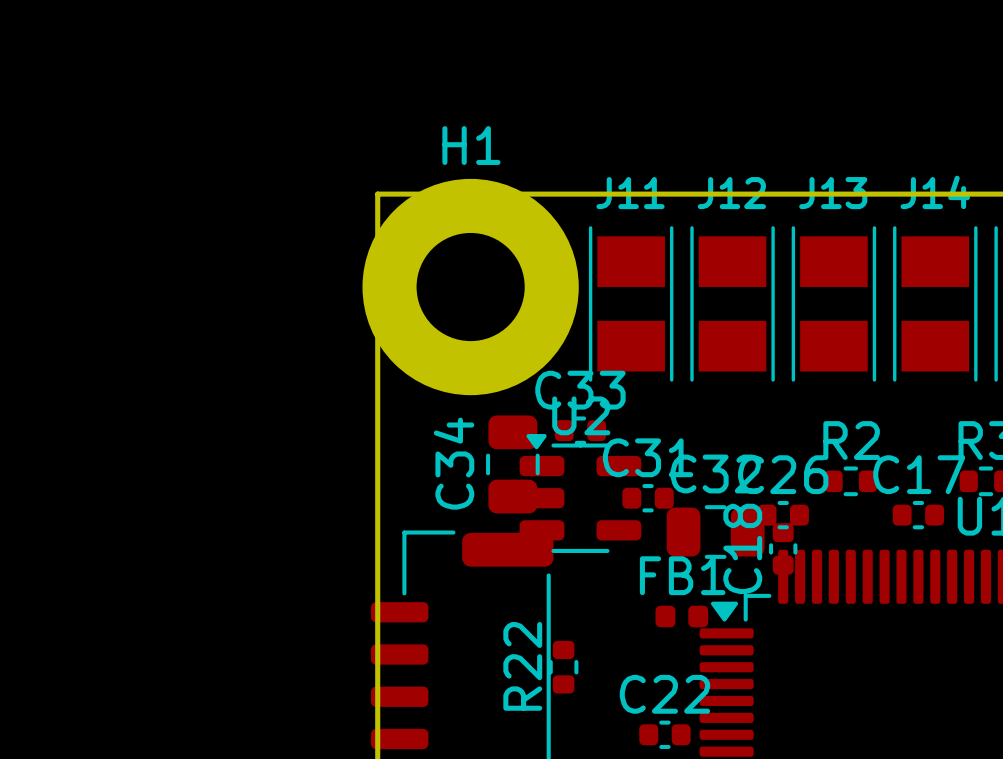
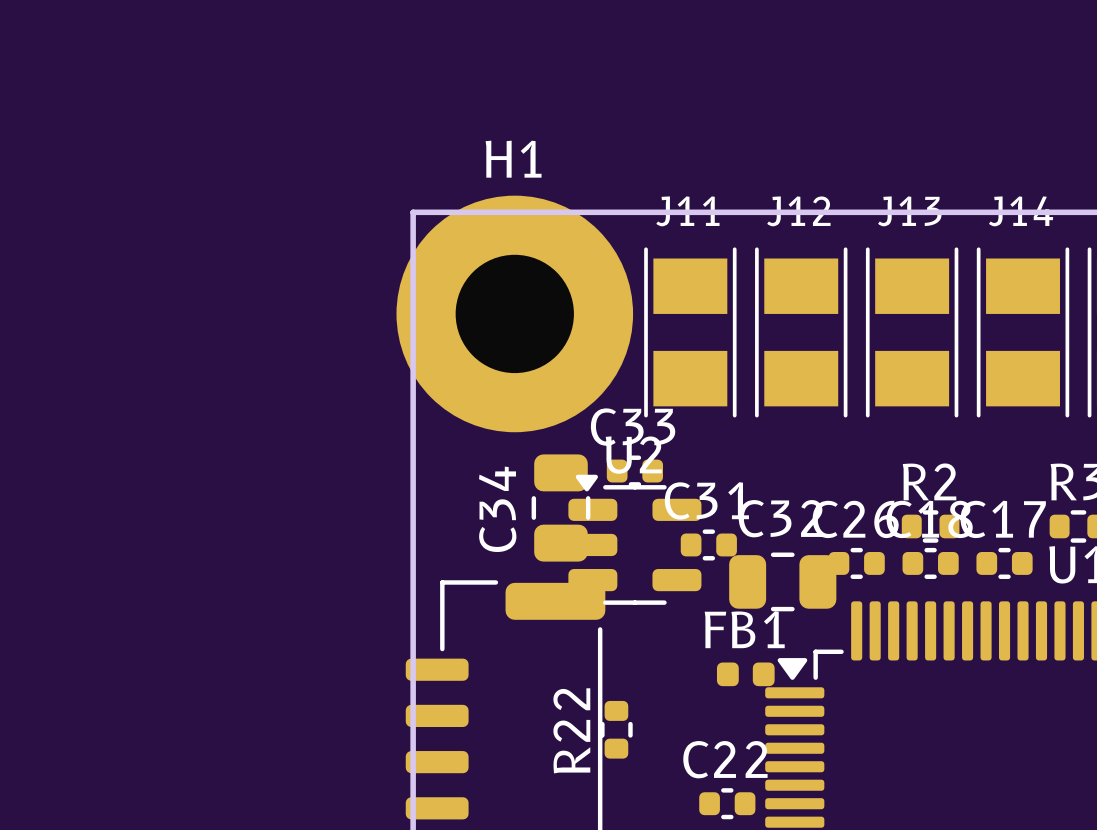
C18 rotation: 0° (783, 548) -> 90° clockwise (930, 563)
C18 position: (783, 548) -> (930, 563)

